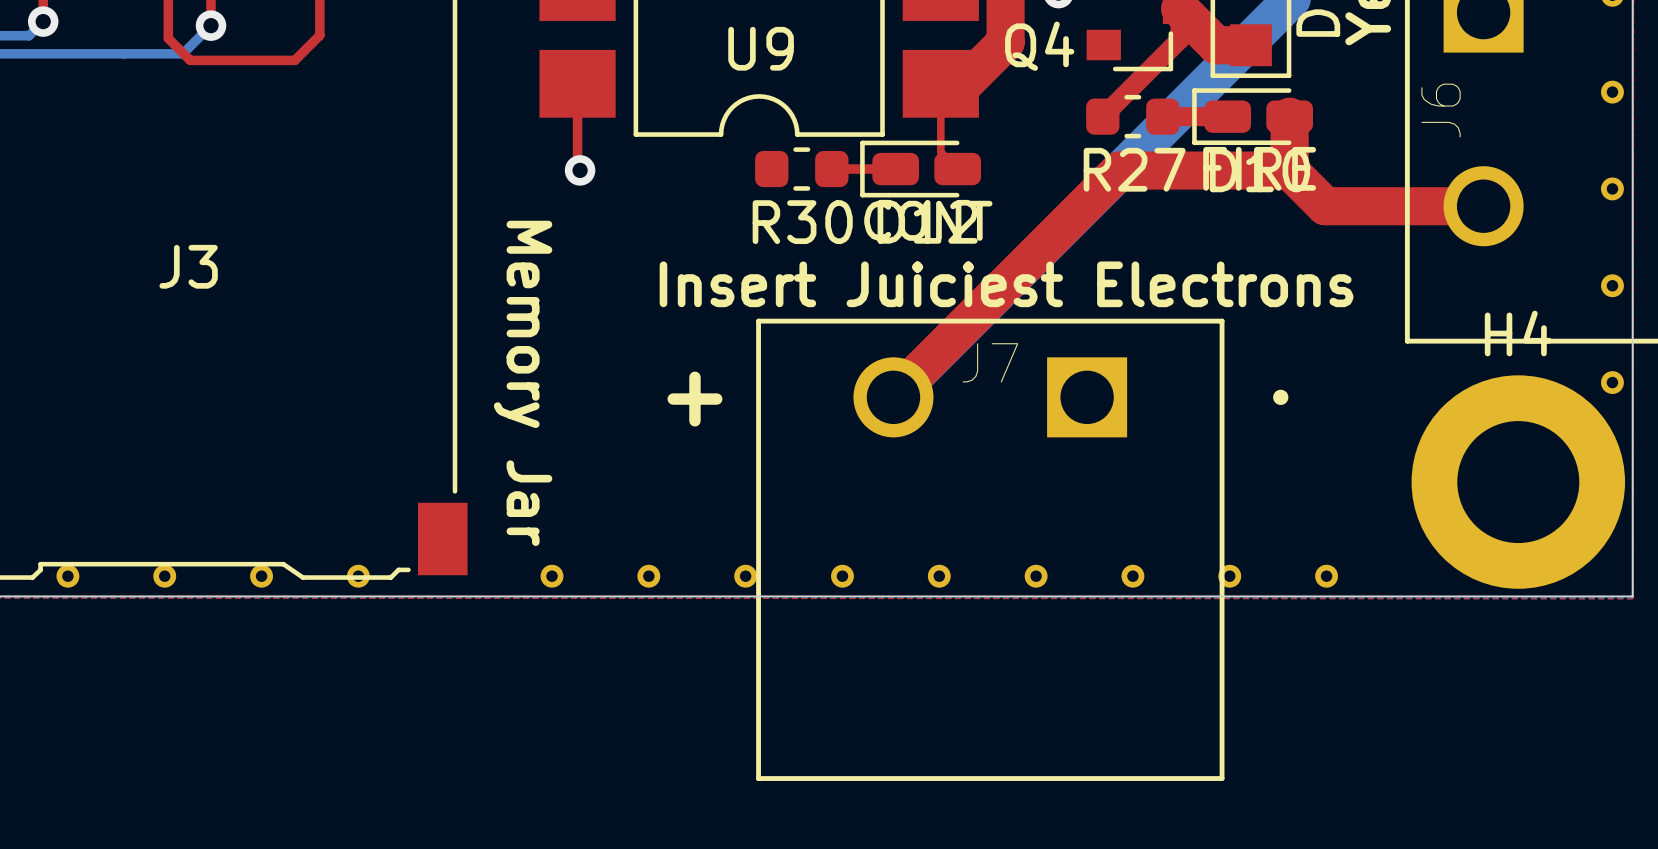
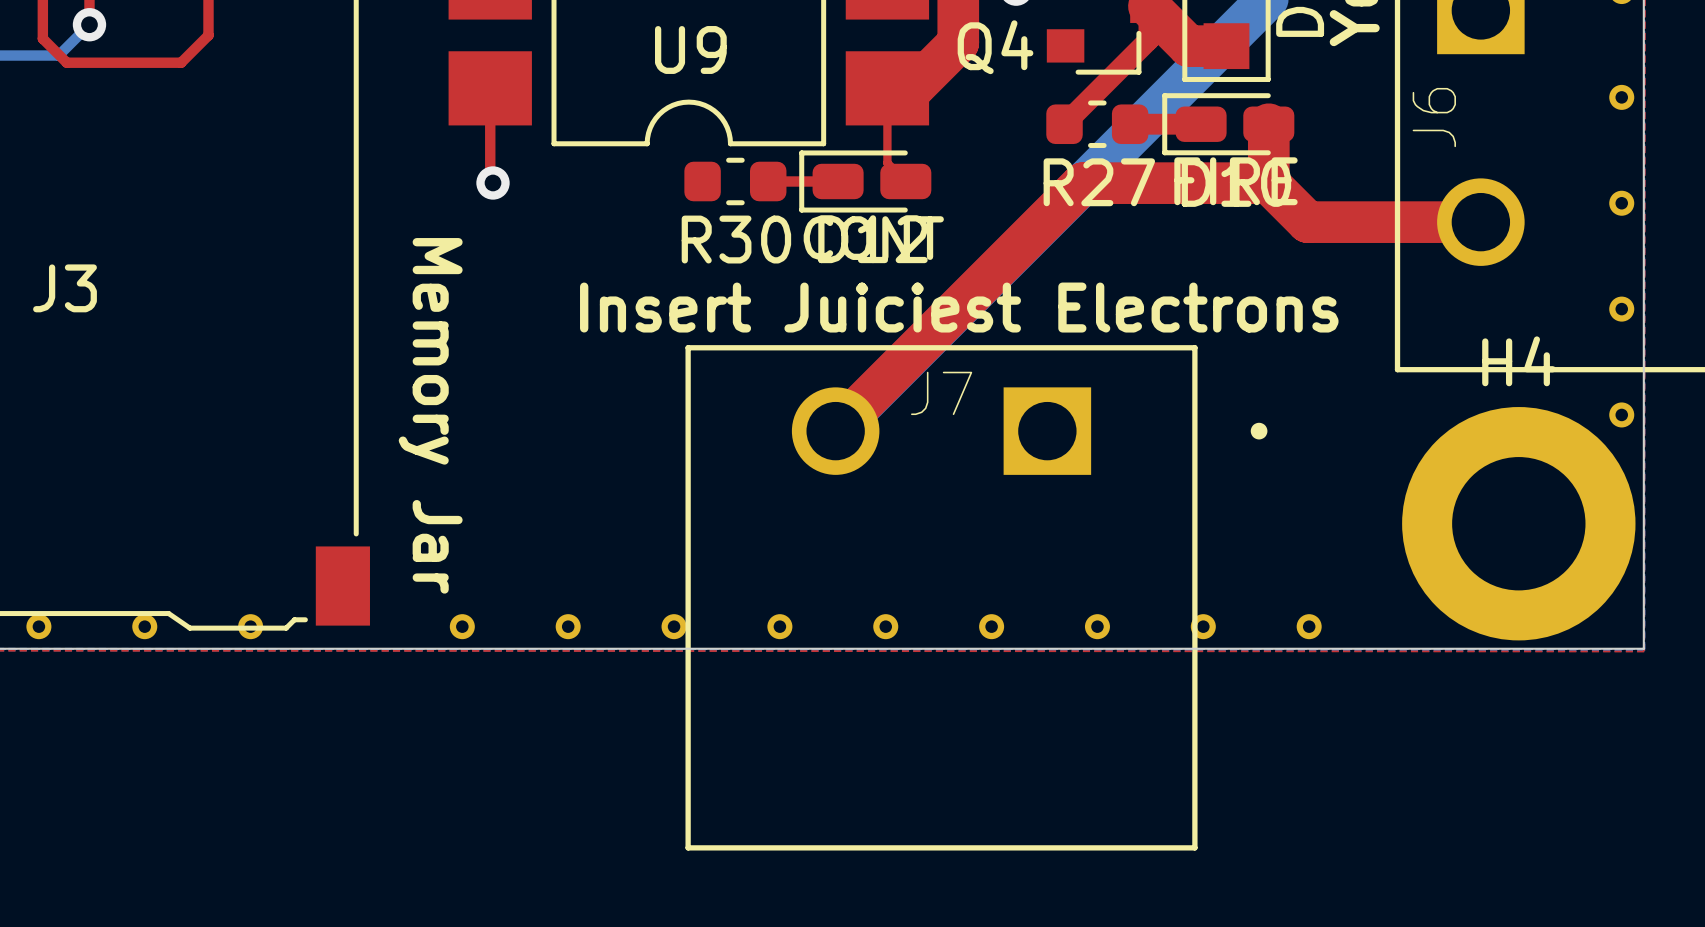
text: + (694, 399) -> none

